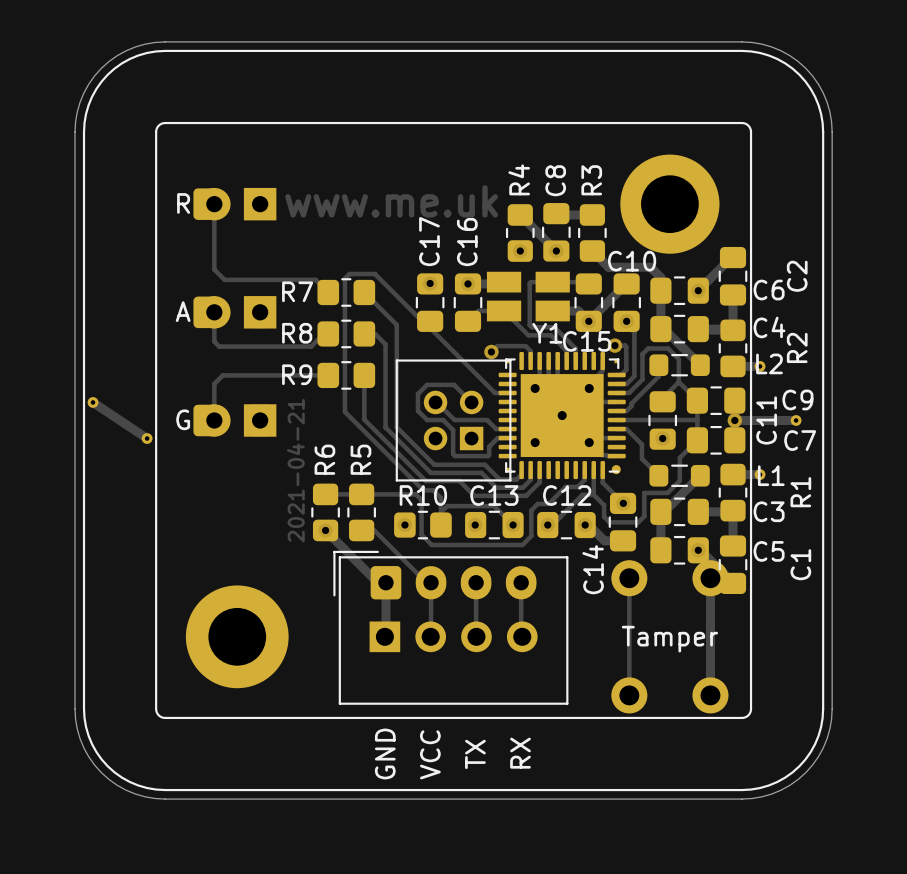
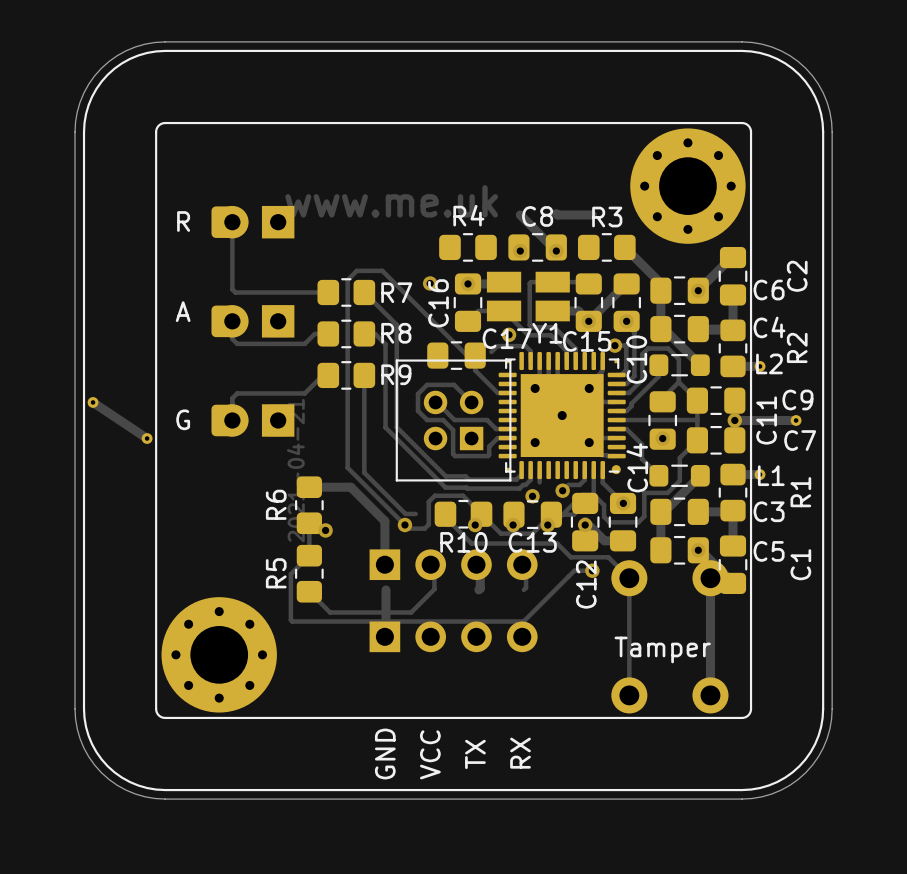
part: none -> (687, 186)
text position: R (183, 203) -> R (183, 221)
track: (214, 204) (214, 269) (224, 279) (315, 279) (328, 292) -> (232, 222) (232, 289) (235, 292) (328, 292)
part position: (234, 204) -> (252, 222)
part: (669, 204) -> none
C8 rotation: 0° (556, 232) -> 90° clockwise (537, 247)
R4 rotation: 0° (520, 233) -> 90° clockwise (468, 247)
R4 position: (520, 233) -> (468, 247)
R3 rotation: 0° (592, 233) -> 90° clockwise (606, 247)
C16 name position: C16 (467, 242) -> C16 (438, 303)
track: (592, 251) (608, 267) (650, 267) (660, 277) (660, 283) -> (624, 247) (660, 283)
C10 name rotation: 0° (632, 261) -> 90° counterclockwise (636, 359)
C10 name position: C10 (632, 261) -> C10 (636, 359)
R7 name position: R7 (297, 291) -> R7 (396, 292)
C17 rotation: 0° (430, 302) -> 90° clockwise (456, 355)
C17 position: (430, 302) -> (456, 355)
track: (214, 312) (214, 341) (219, 346) (311, 346) (323, 333) -> (232, 312) (232, 339) (237, 343) (304, 343) (314, 333) (323, 333)
part position: (234, 312) -> (252, 321)
R8 name position: R8 (297, 333) -> R8 (396, 333)
via position: (491, 351) -> (509, 334)
R9 name position: R9 (297, 374) -> R9 (396, 374)
track: (322, 375) (222, 375) (214, 383) (214, 420) -> (322, 375) (304, 393) (237, 393) (232, 398) (232, 420)
track: (497, 393) (495, 393) (430, 328) (430, 321) (422, 321) (374, 274) (349, 274) (344, 278) (344, 411) (423, 490) (433, 490) (440, 498) (440, 525) -> (497, 393) (475, 370) (475, 355) (467, 355) (382, 270) (356, 270) (347, 280) (347, 467) (408, 528) (424, 528) (428, 524) (428, 501) (434, 495) (463, 495) (500, 533) (532, 533) (551, 514) (573, 514) (593, 494)
track: (364, 419) (425, 481) (459, 481) (474, 495) (526, 495) (539, 482) -> (364, 419) (364, 472) (405, 513) (415, 513)
part position: (234, 420) -> (252, 420)
R6 name position: R6 (324, 459) -> R6 (276, 504)
R5 name position: R5 (360, 459) -> R5 (276, 573)
track: (434, 464) (484, 464) (499, 479) -> (434, 464) (445, 476) (465, 476) (468, 479) (499, 479)
track: (430, 472) (481, 472) (496, 487) (522, 487) (525, 484) -> (430, 472) (445, 487) (519, 488) (525, 484)
track: (579, 484) (577, 486) (565, 486) (548, 503) (537, 503) (531, 510) (531, 536) (522, 545) (431, 545) (421, 534) (421, 500) (415, 494) (325, 494) -> (579, 484) (568, 484) (562, 490)
track: none -> (309, 487) (350, 487) (384, 521) (384, 564)
via: none -> (562, 490)
R10 name position: R10 (423, 495) -> R10 (463, 542)
C13 name position: C13 (494, 495) -> C13 (532, 542)
C12 name position: C12 (567, 495) -> C12 (586, 584)
via: none -> (532, 496)
R6 position: (325, 512) -> (309, 505)
R5 position: (361, 512) -> (309, 573)
track: (440, 512) (447, 506) (494, 506) (513, 525) -> none
track: none -> (448, 520) (471, 543) (557, 543) (570, 557) (608, 557) (629, 578)
track: none -> (309, 523) (309, 555) (290, 574) (292, 621) (523, 621) (574, 570) (592, 570)
R10 position: (422, 525) -> (463, 514)
C13 position: (494, 525) -> (532, 514)
C12 rotation: 0° (566, 525) -> 90° clockwise (585, 522)
track: (328, 530) (325, 530) (377, 582) (385, 582) -> none
track: (361, 530) (374, 530) (426, 582) (431, 582) -> none
track: none -> (434, 564) (434, 589) (411, 612) (330, 612) (309, 591)
part: none -> (453, 564)
track: none -> (480, 564) (478, 589)
track: none -> (526, 564) (526, 587) (523, 589)
C14 name position: C14 (593, 569) -> C14 (637, 467)
via: none -> (592, 570)
track: (431, 589) (430, 636) -> none
track: (476, 589) (476, 636) -> none
track: (521, 589) (522, 636) -> none
part: (450, 627) -> none
part: (237, 636) -> none
text position: Tamper (669, 639) -> Tamper (662, 649)
part: none -> (219, 654)

